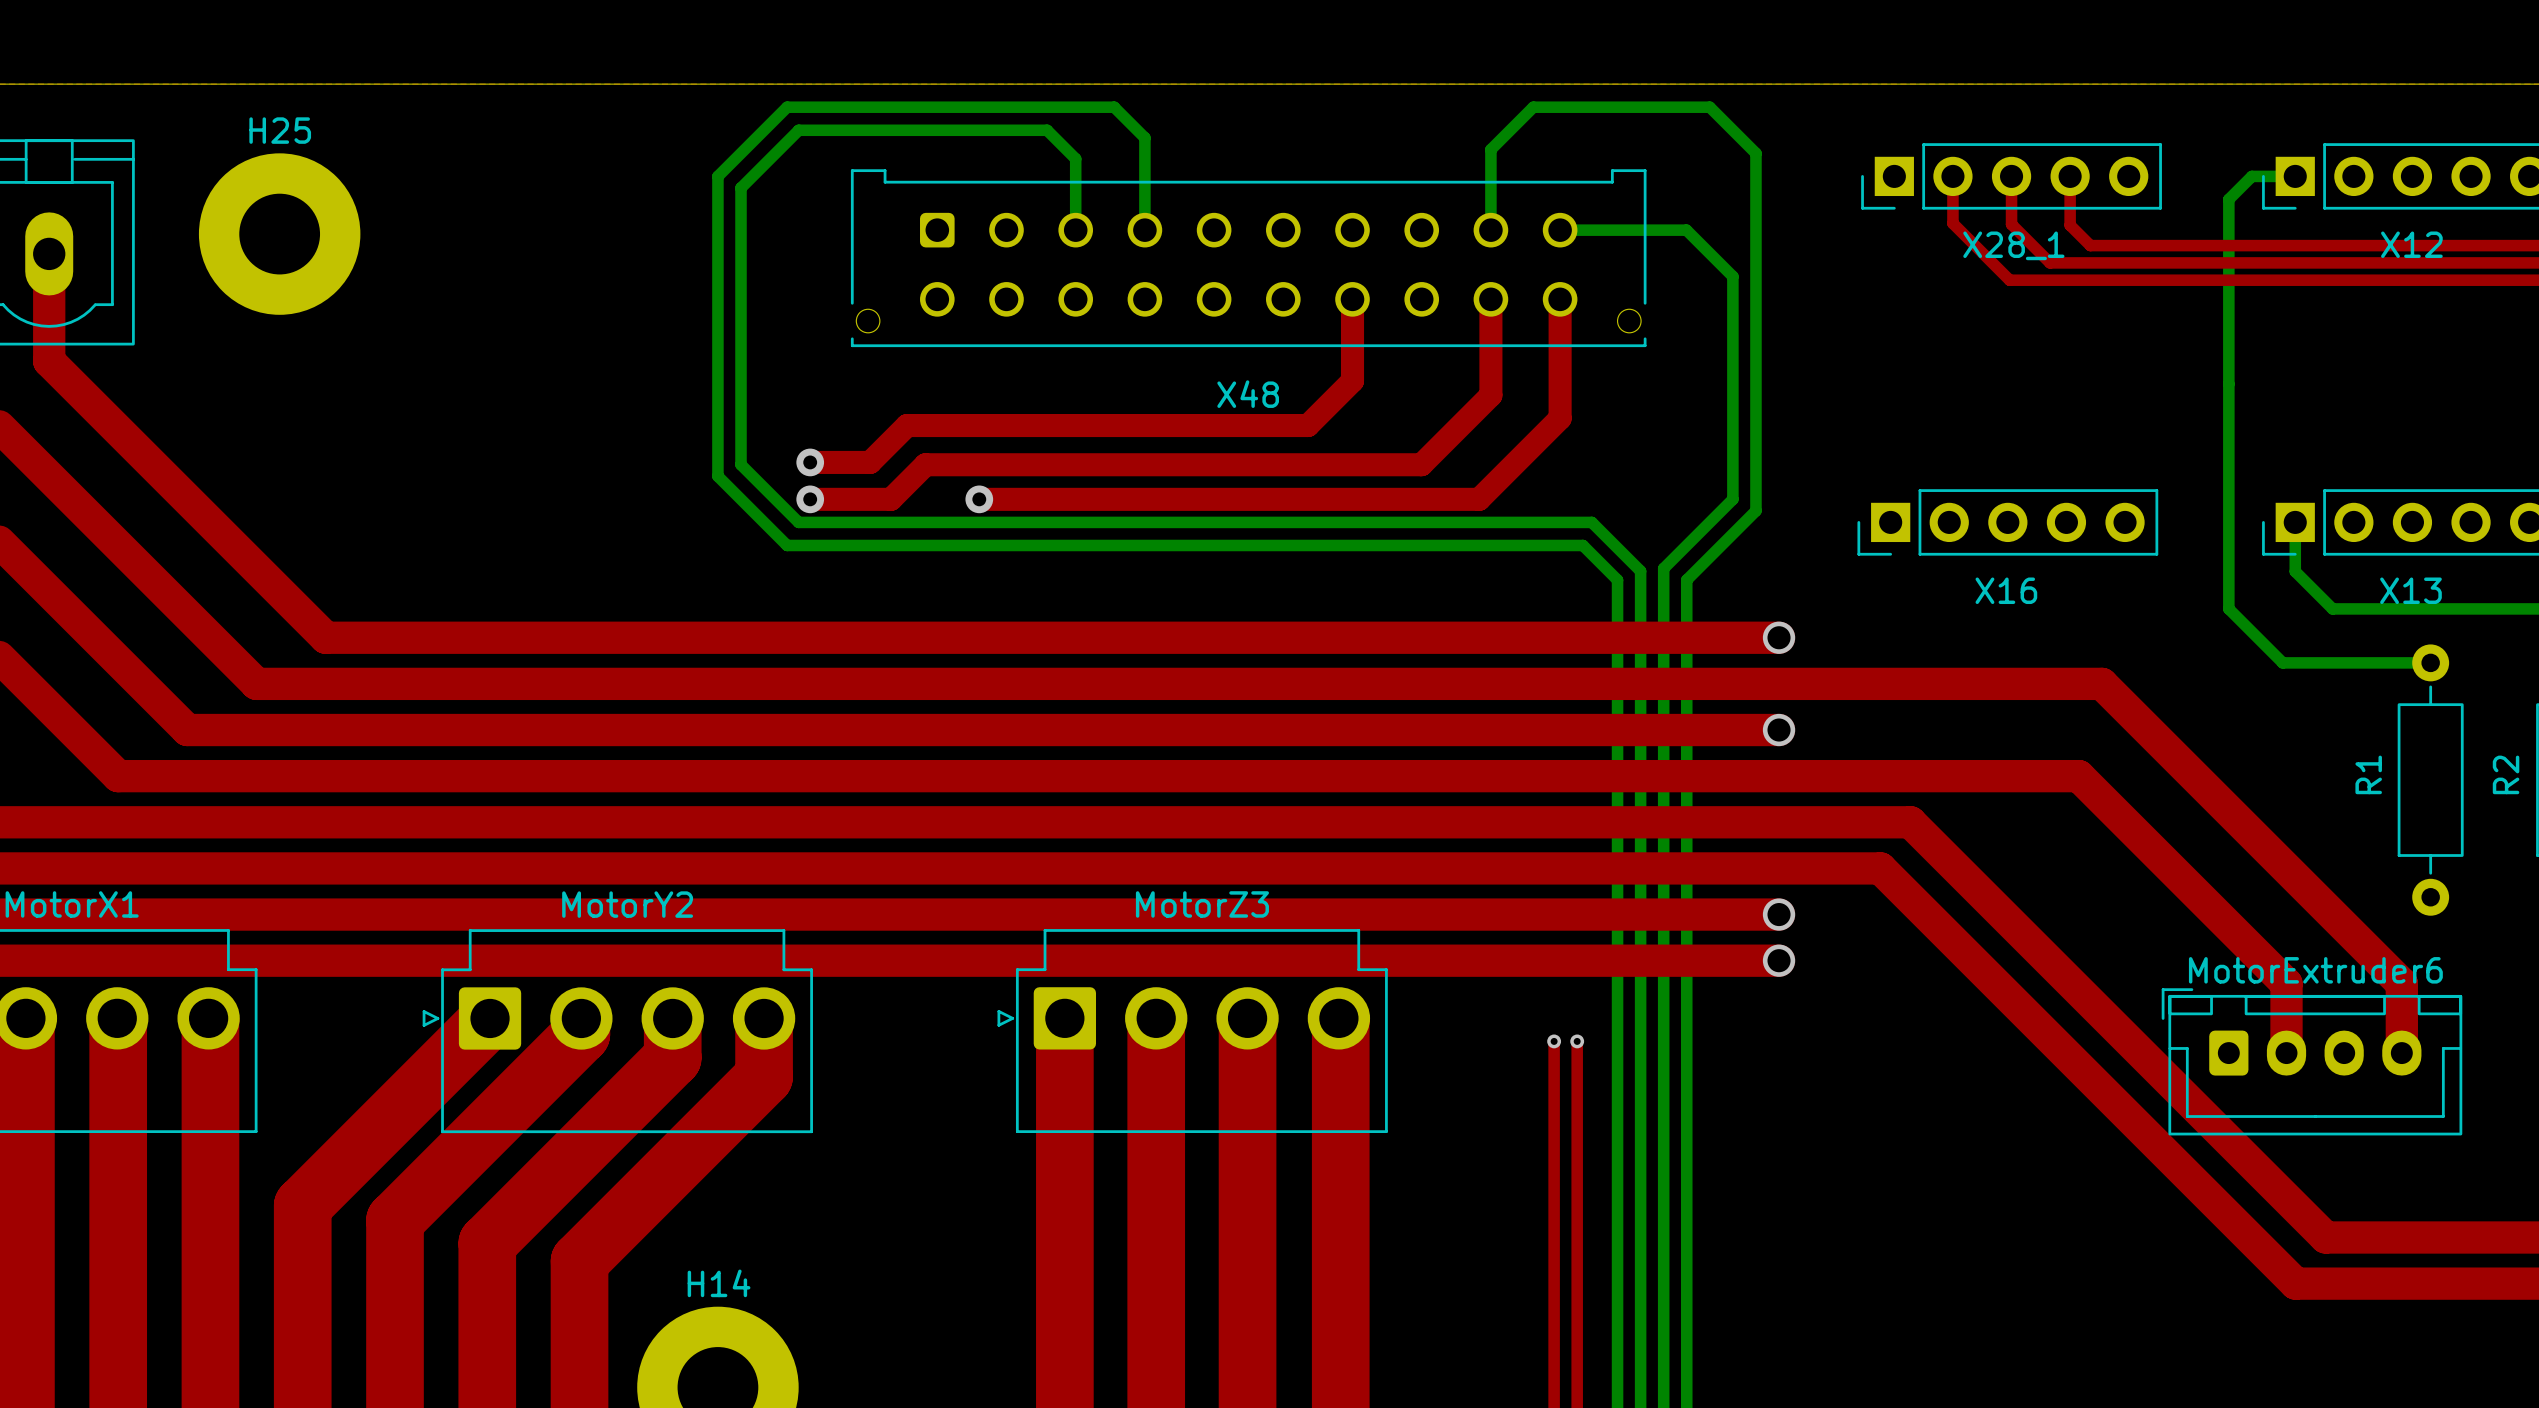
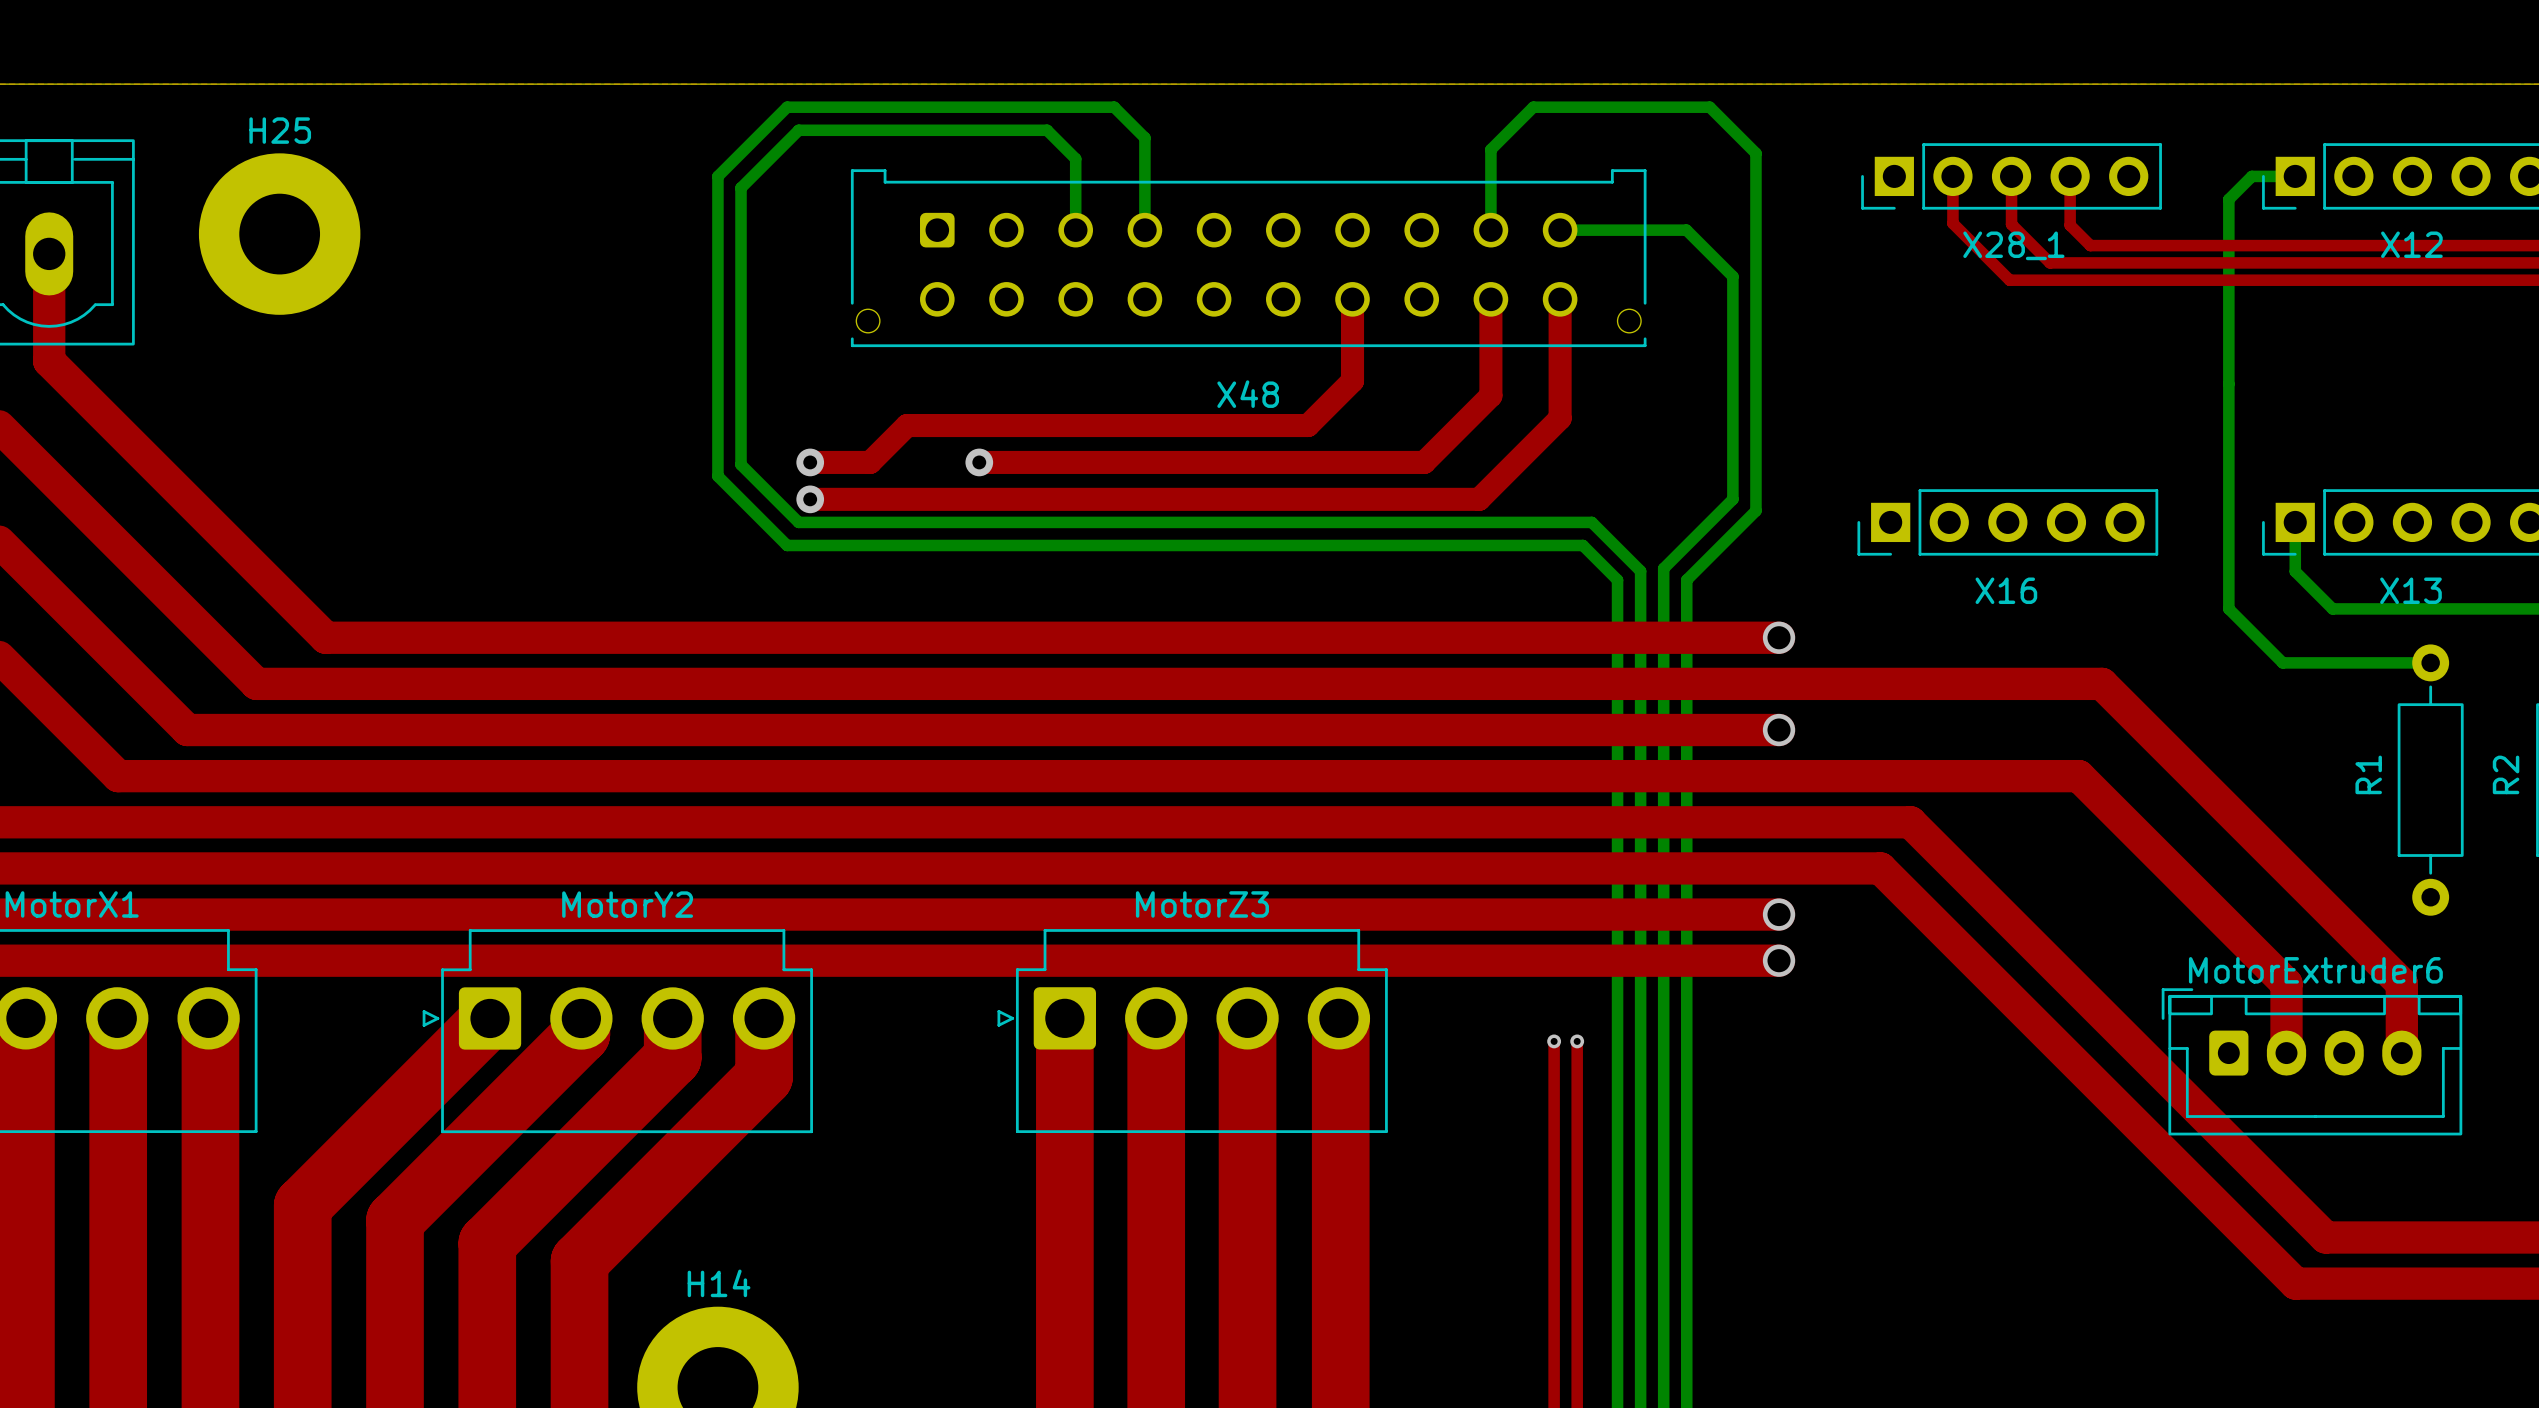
top track: (1490, 395) (1421, 464) (925, 464) (890, 499) -> (1490, 395) (1424, 462) (979, 462)
top track: none -> (890, 499) (979, 499)
via position: (979, 499) -> (979, 462)

